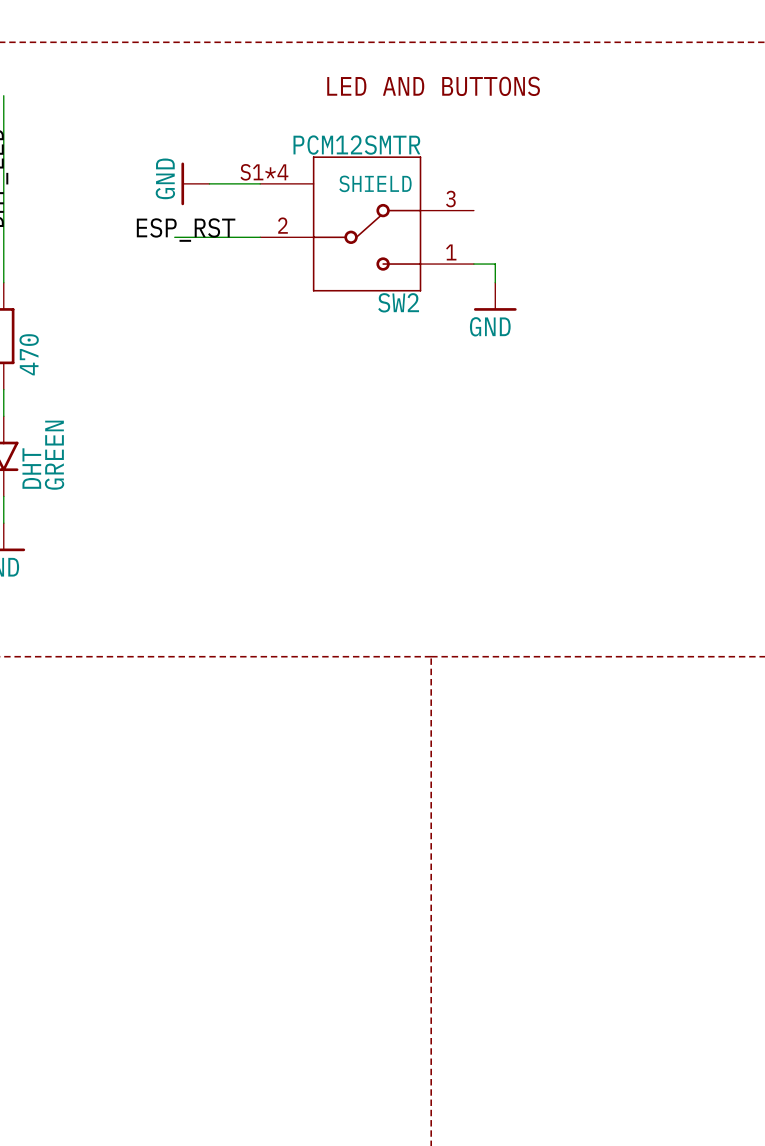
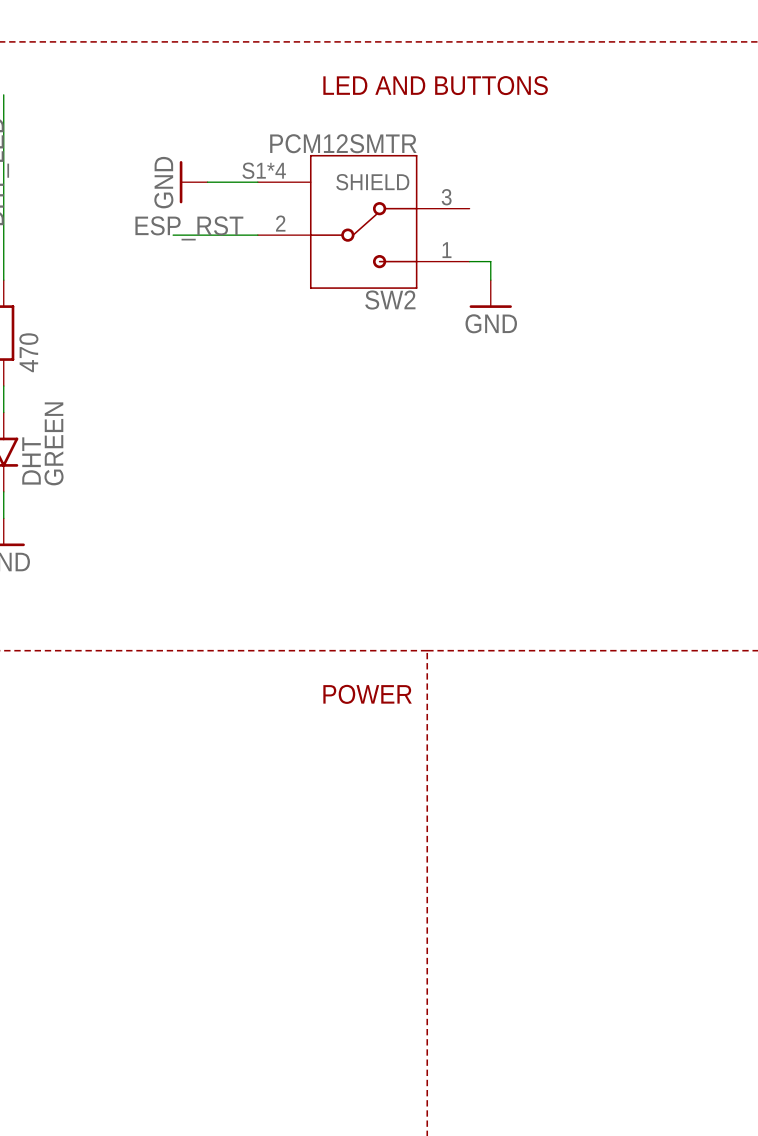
text: none -> POWER (367, 694)

